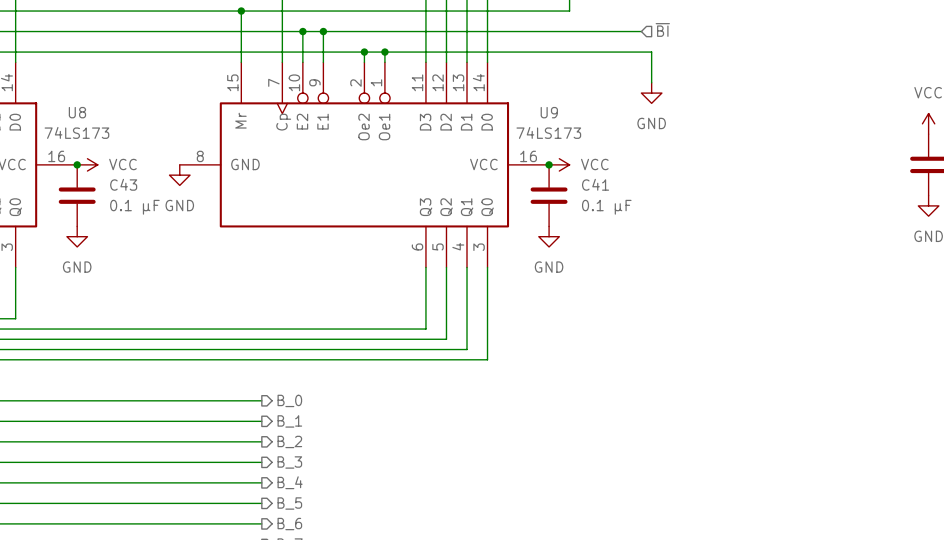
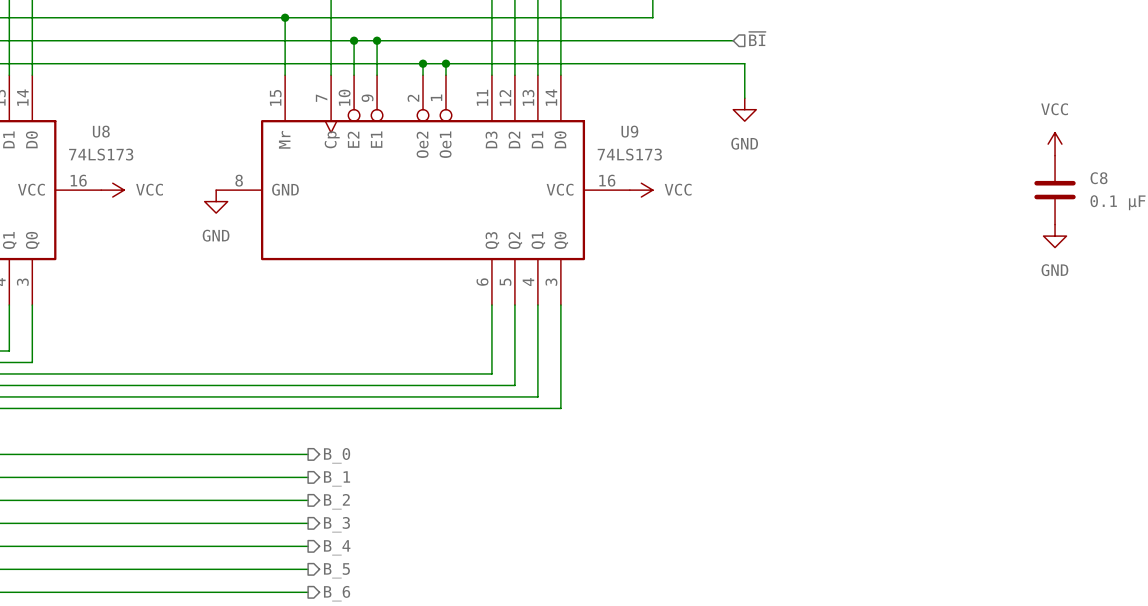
junction: (77, 164) -> none
junction: (549, 164) -> none
C43: 0.1 µF (77, 195) -> none
C41: 0.1 µF (549, 195) -> none
power symbol: GND (77, 236) -> none
power symbol: GND (549, 236) -> none

